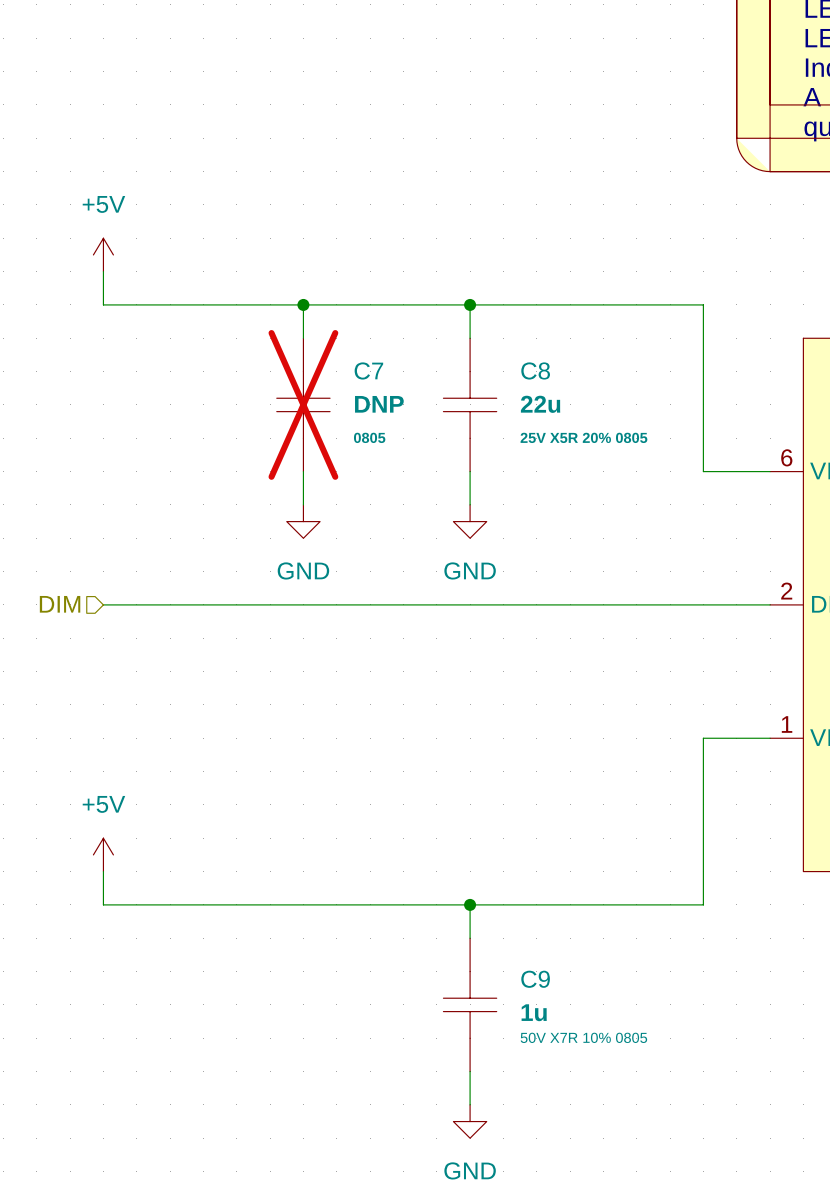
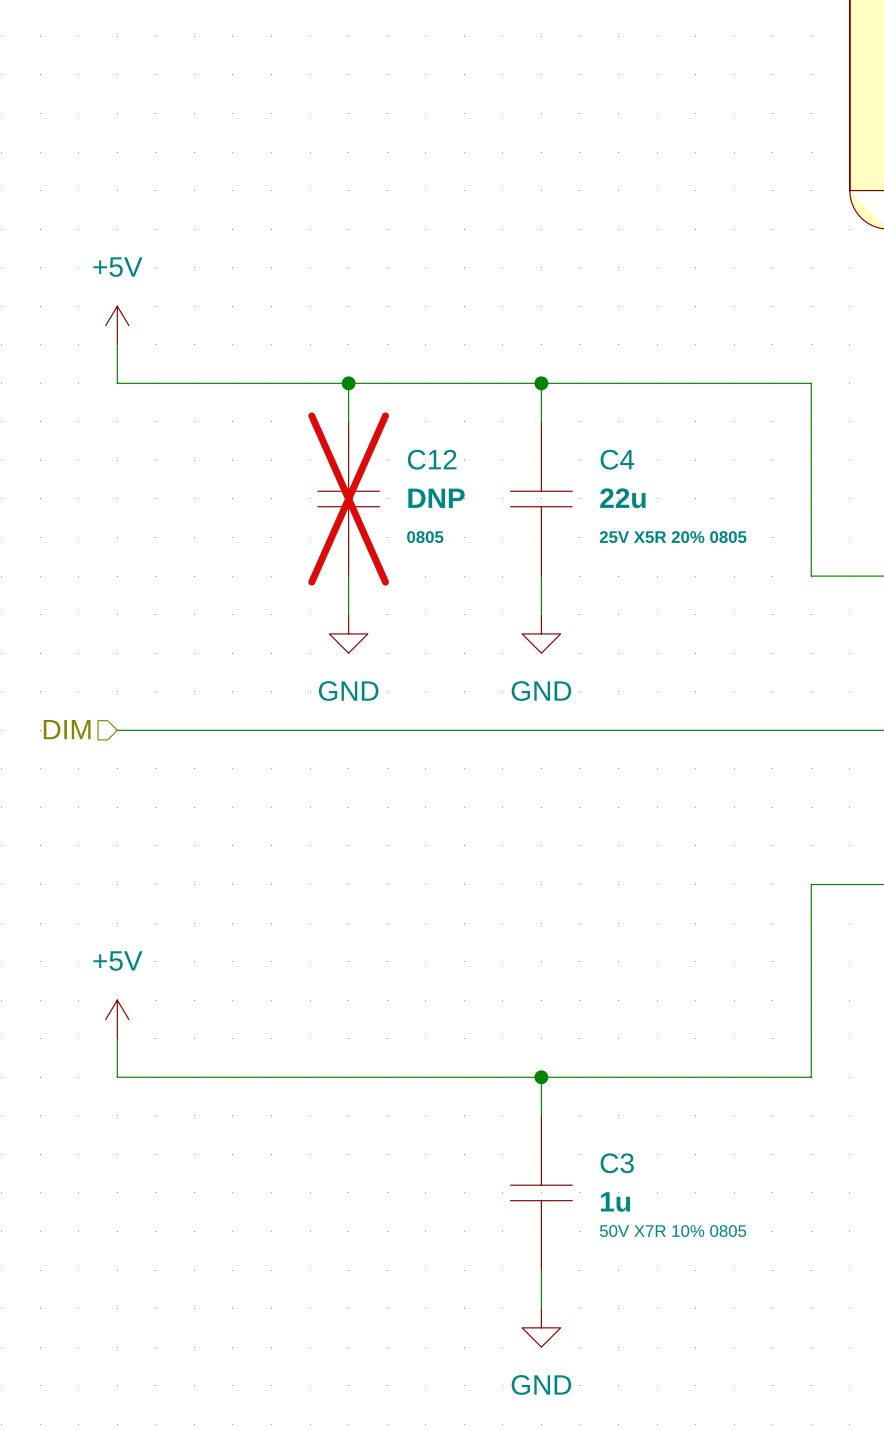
C7 name: C7 (368, 370) -> C12 (432, 459)
C8 name: C8 (535, 370) -> C4 (617, 459)
C9 name: C9 (535, 979) -> C3 (617, 1163)

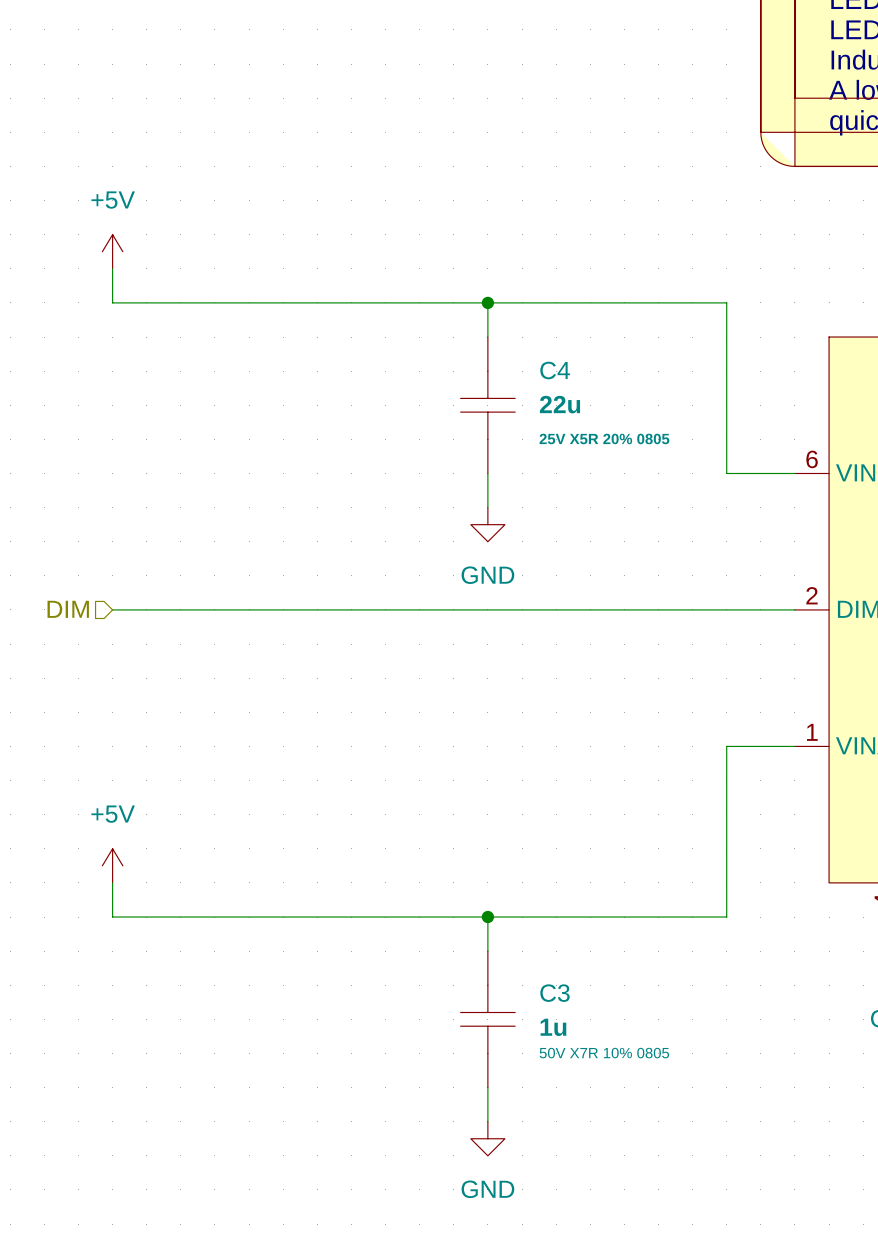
wire: (348, 383) (348, 421) -> none
junction: (348, 383) -> none
C12: DNP (348, 498) -> none
wire: (348, 576) (348, 614) -> none
power symbol: GND (348, 633) -> none

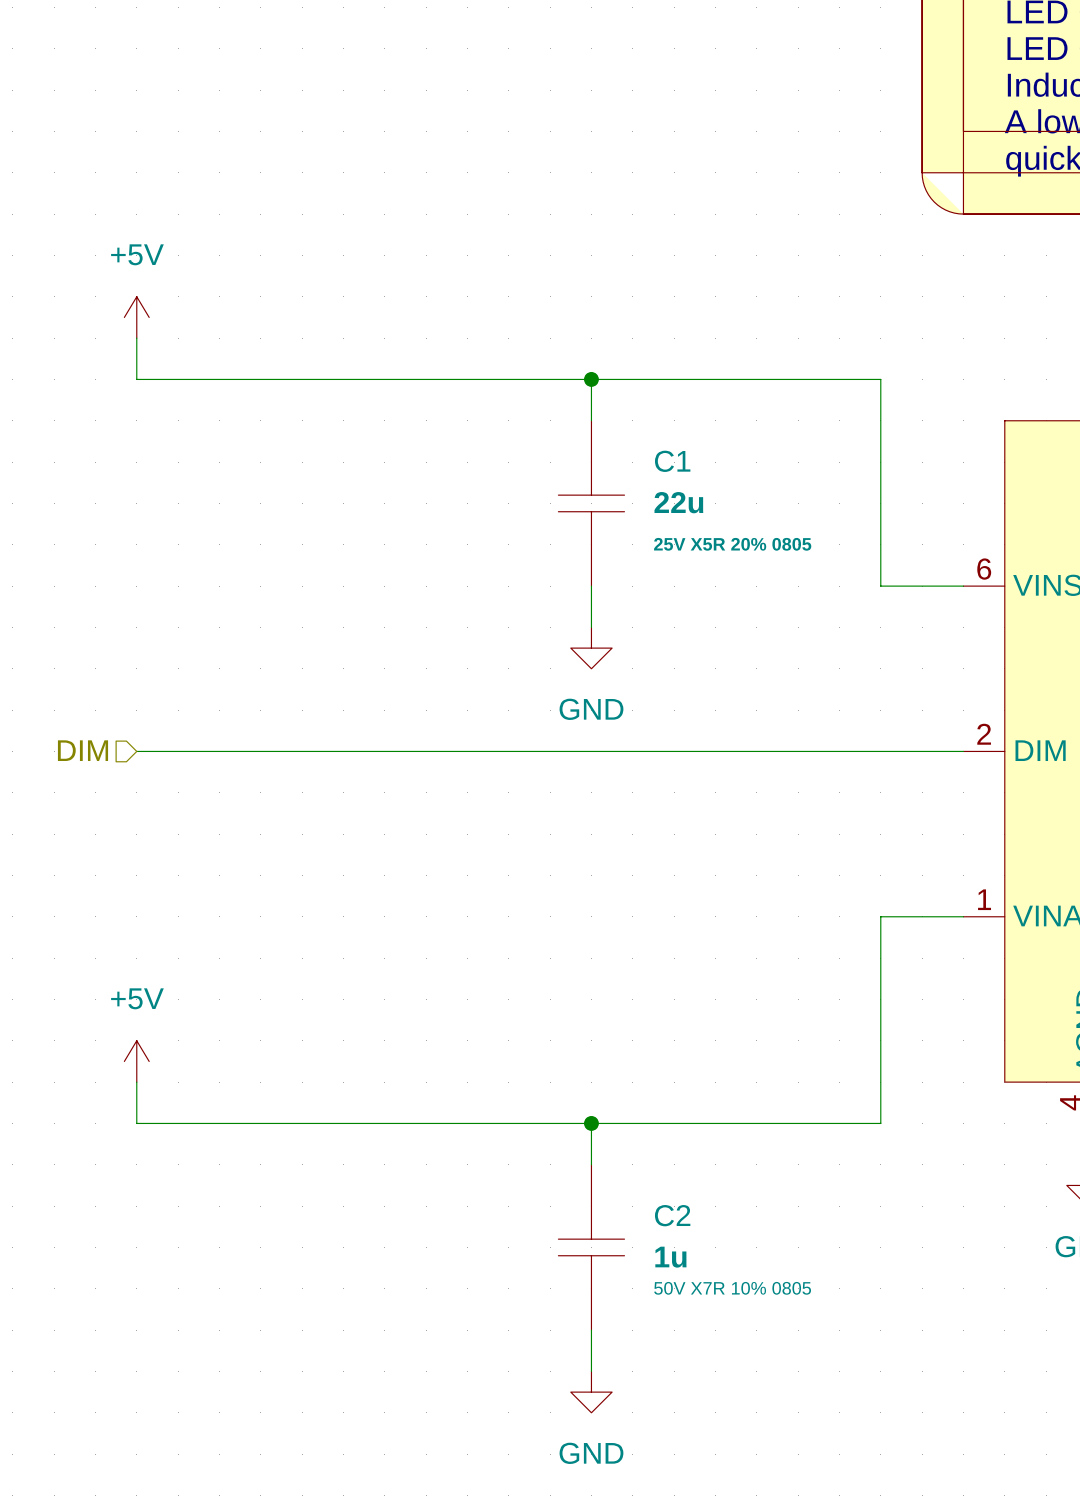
C4 name: C4 (555, 370) -> C1 (672, 461)
C3 name: C3 (554, 993) -> C2 (672, 1215)

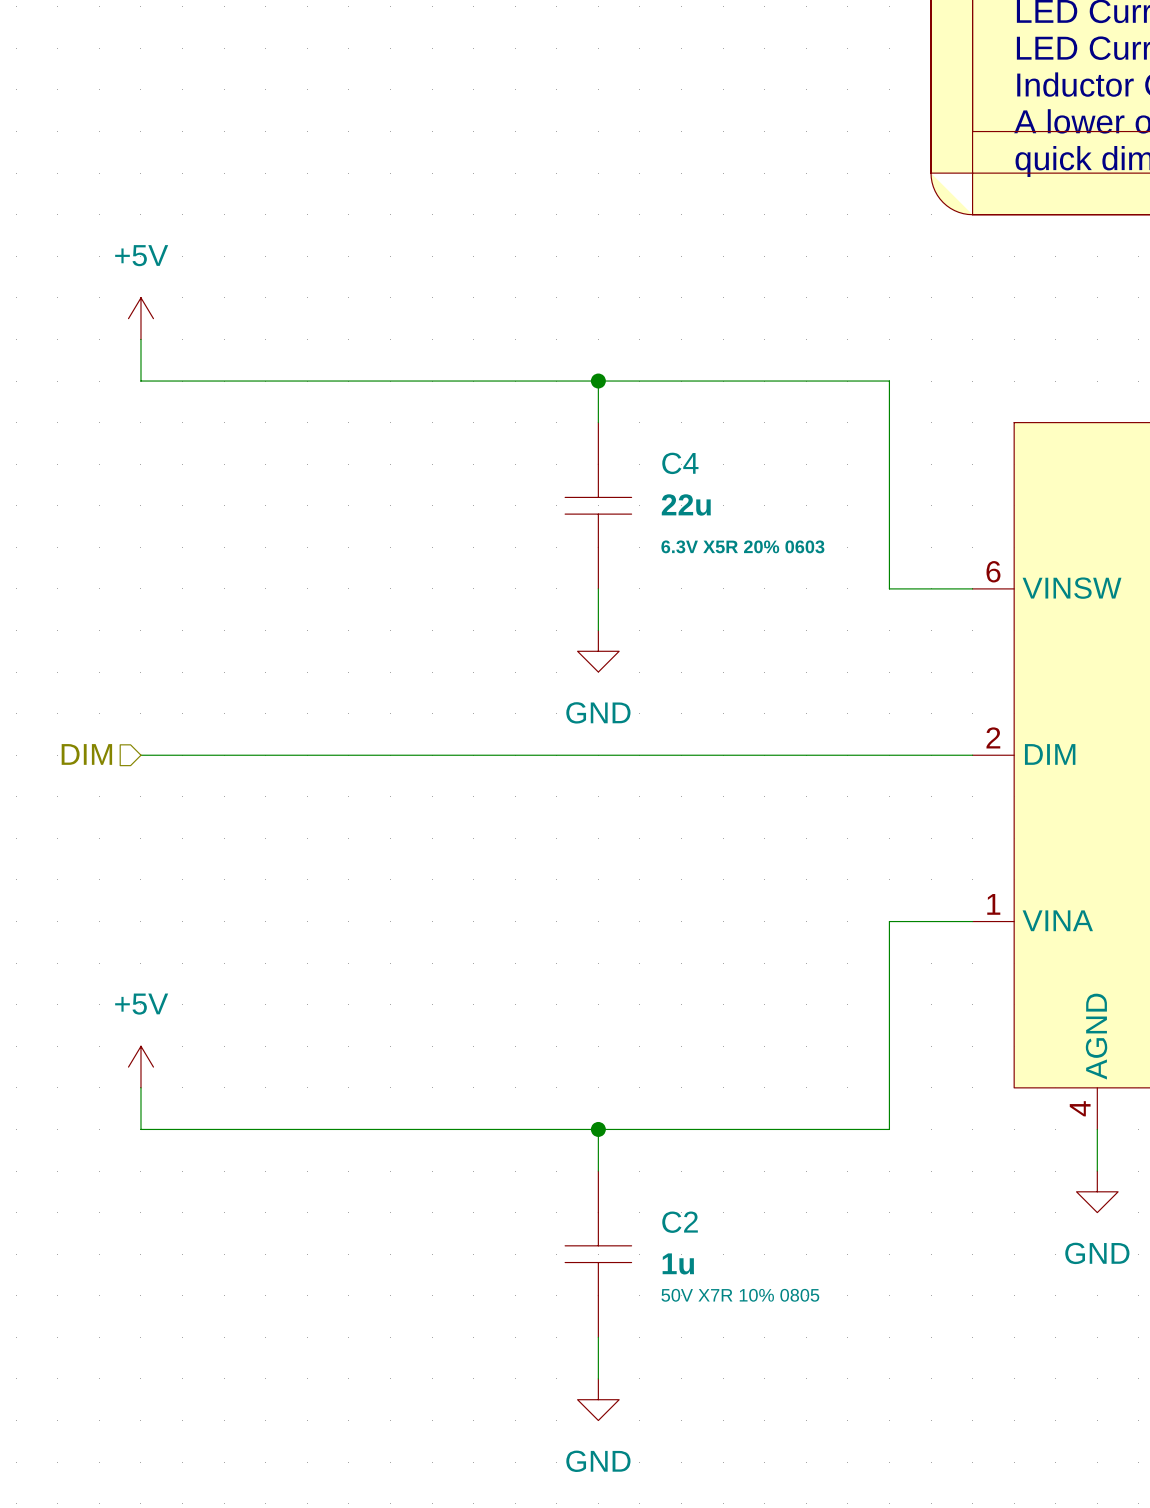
C1 name: C1 (672, 461) -> C4 (680, 463)
C1 text: 25V X5R 20% 0805 (732, 544) -> 6.3V X5R 20% 0603 (742, 546)

